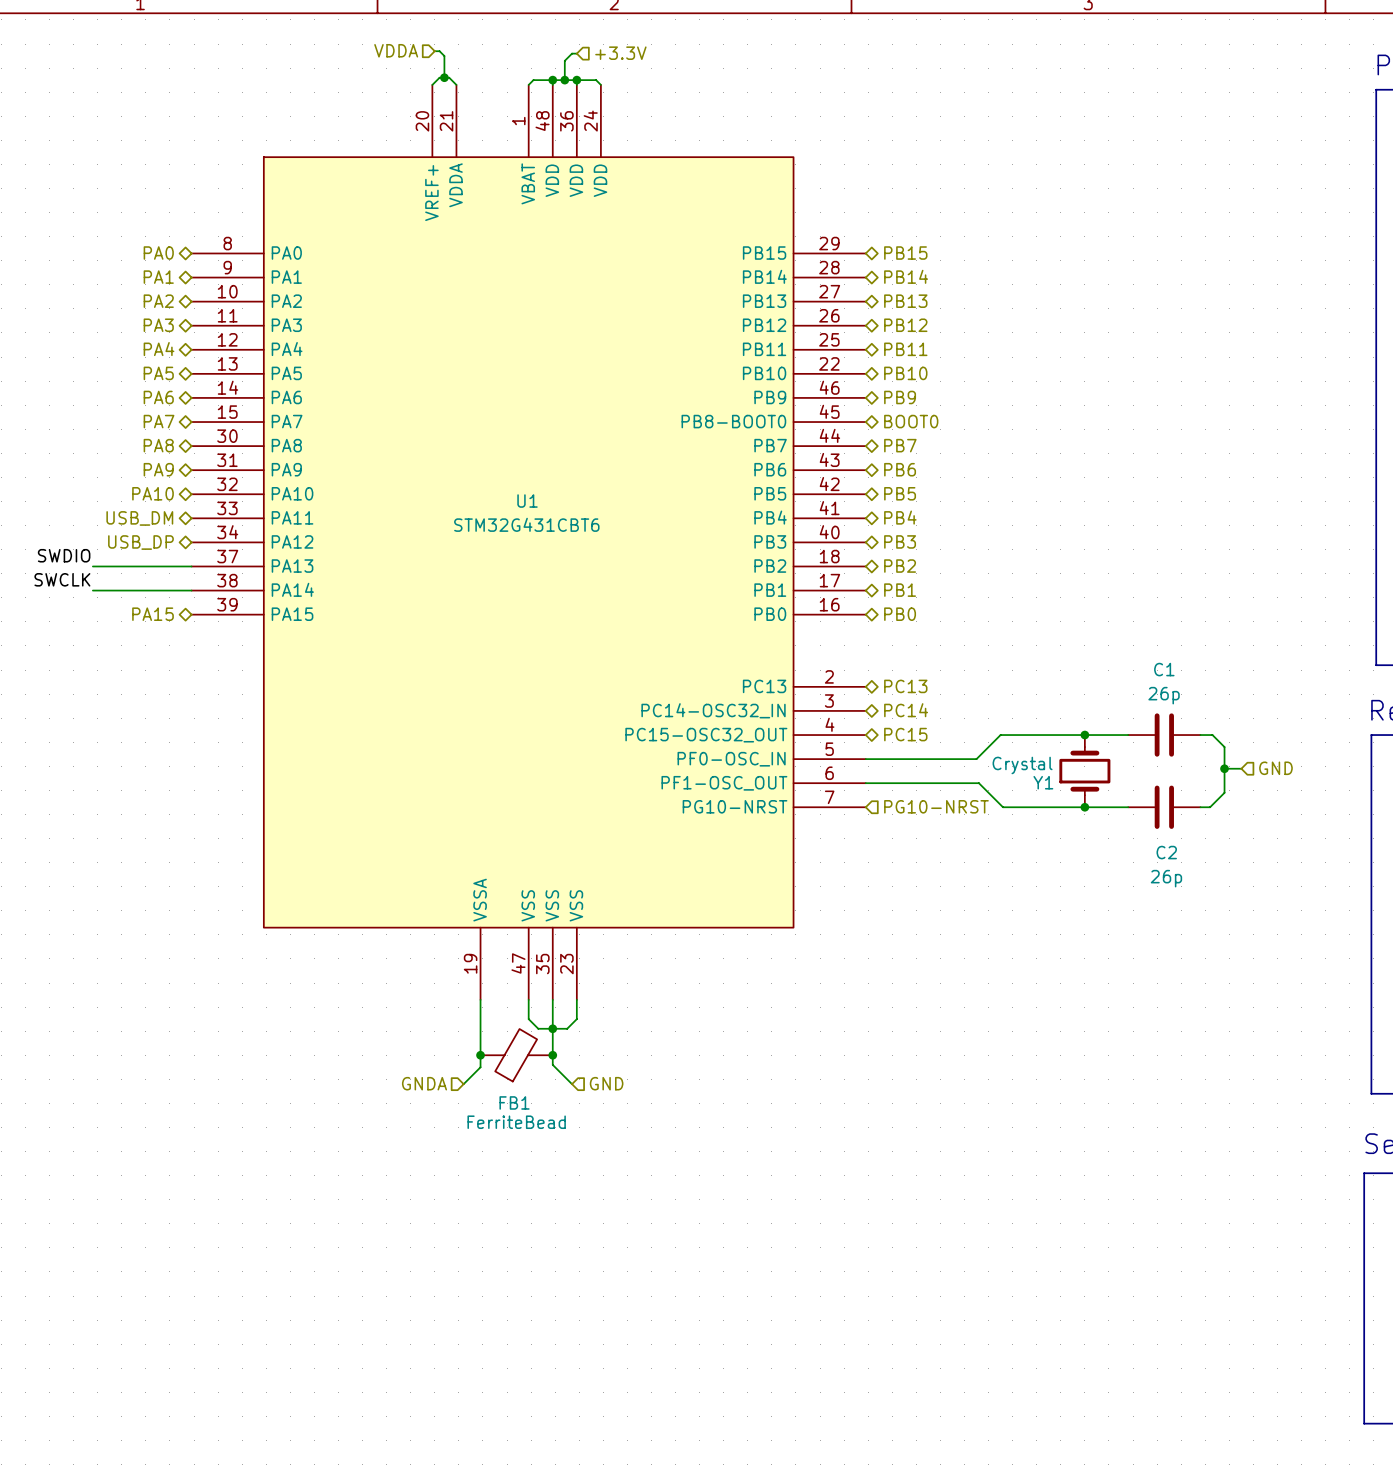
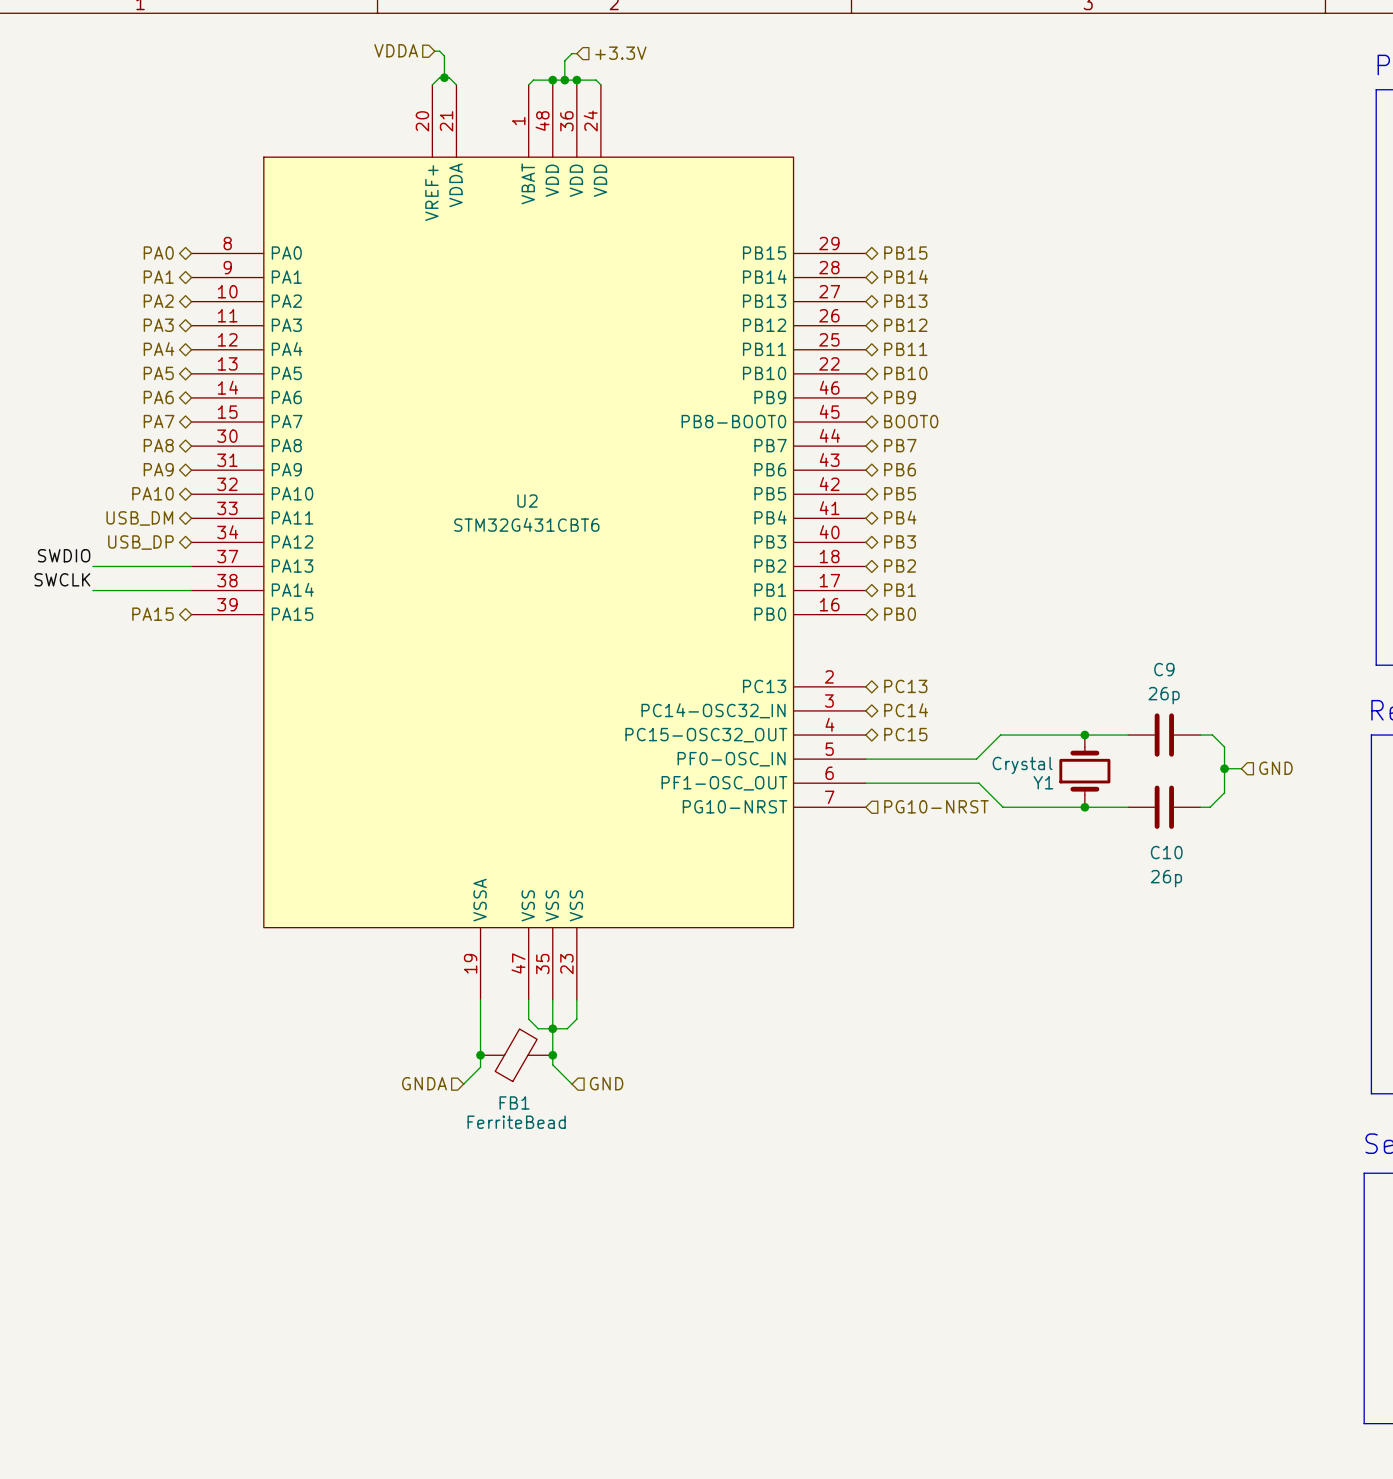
U1 name: U1 (527, 501) -> U2 (527, 501)
C1 name: C1 (1164, 669) -> C9 (1164, 669)
C2 name: C2 (1166, 852) -> C10 (1166, 852)

